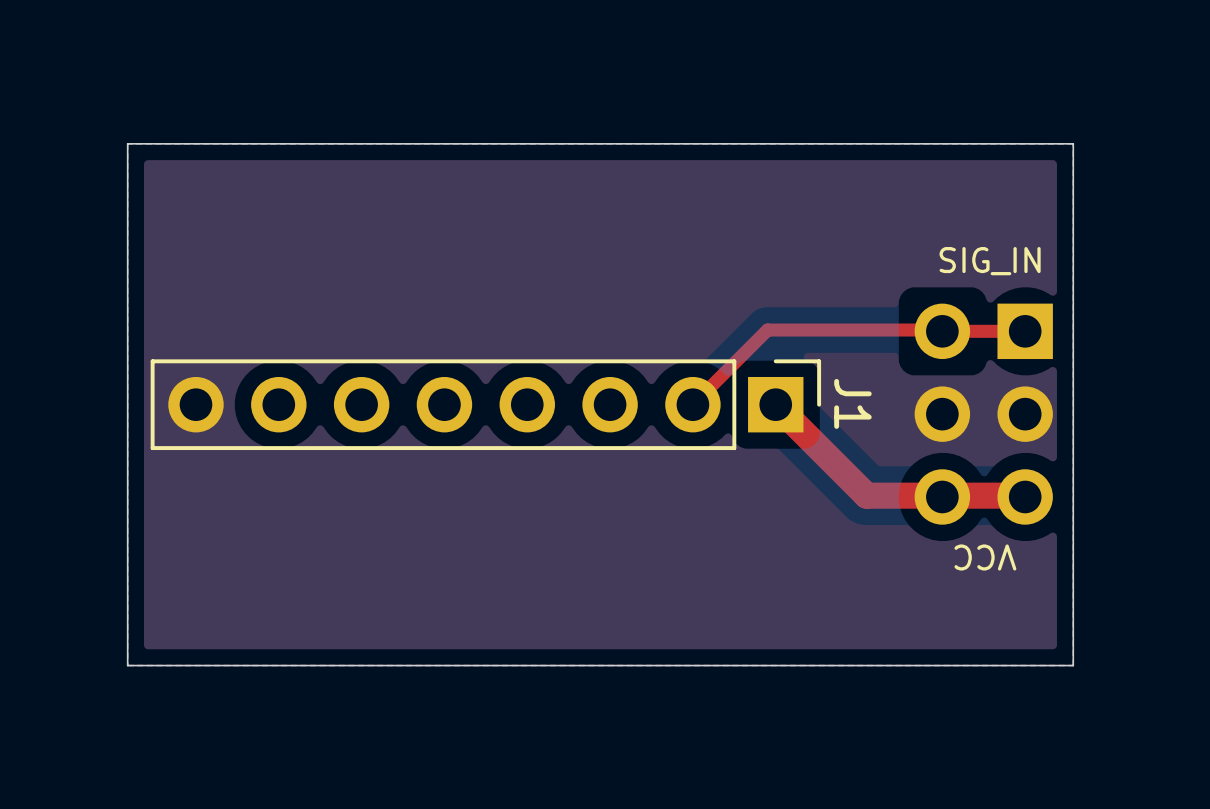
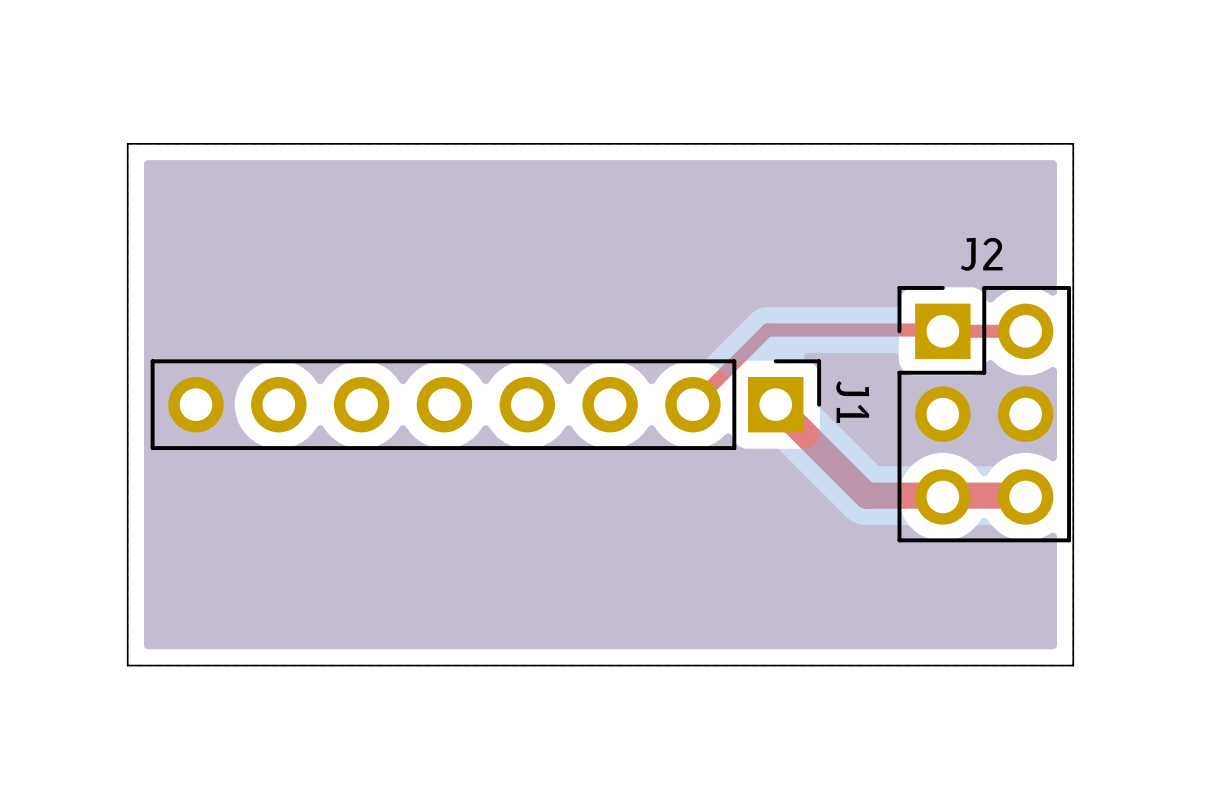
text: SIG_IN (990, 261) -> none
J2 side: top (983, 414) -> bottom (984, 414)
text: VCC (985, 557) -> none

